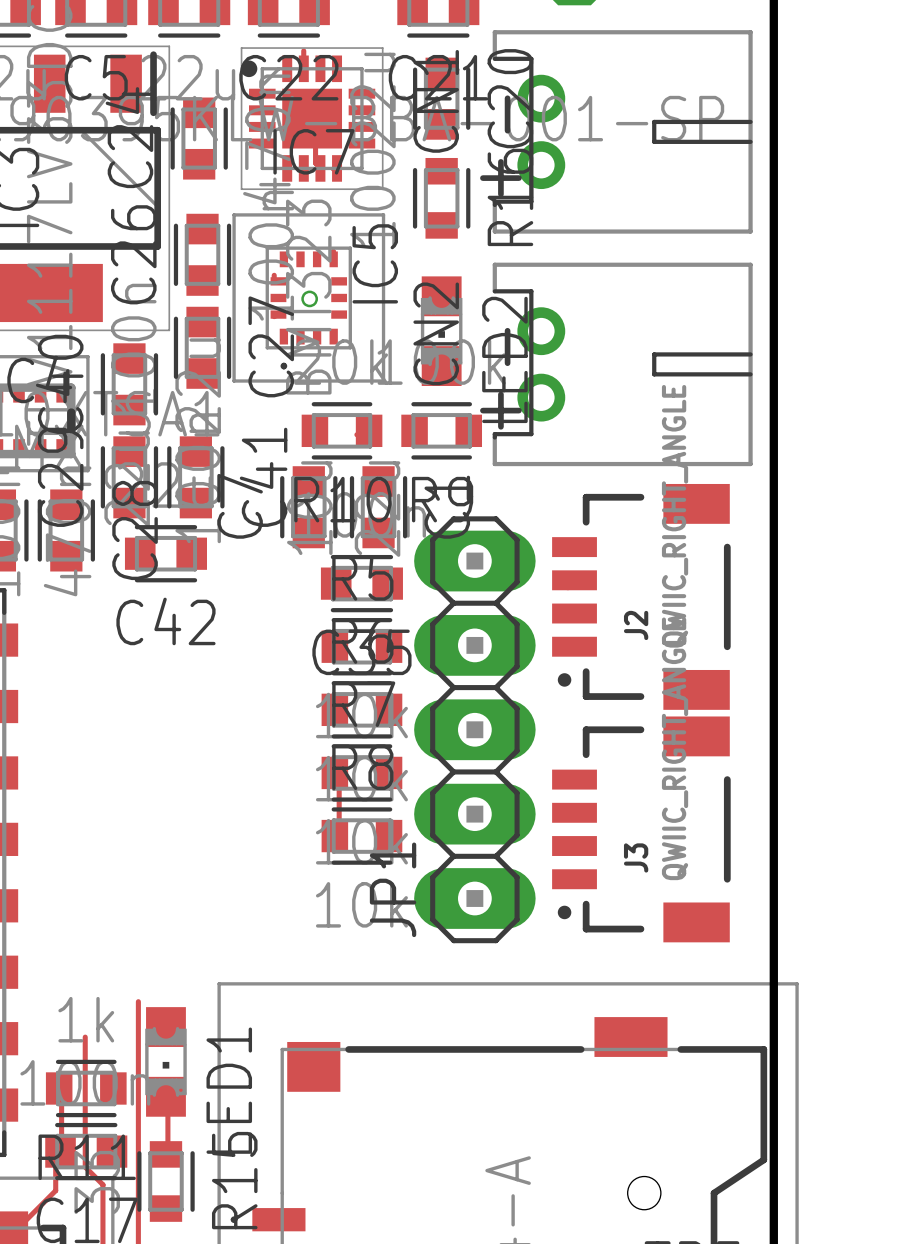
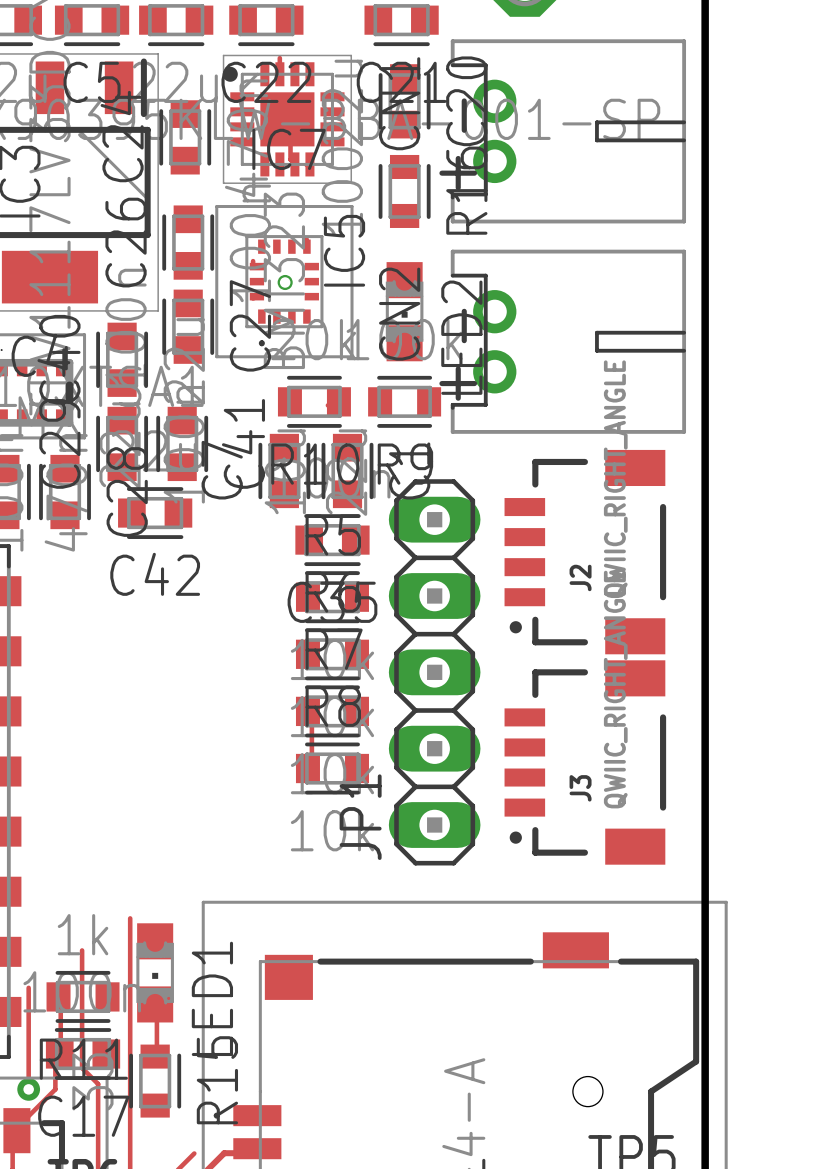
JP1 footprint: [414, 516, 536, 944] -> [388, 479, 481, 866]
track: none -> (28, 987) (28, 1089)
via: none -> (28, 1089)

